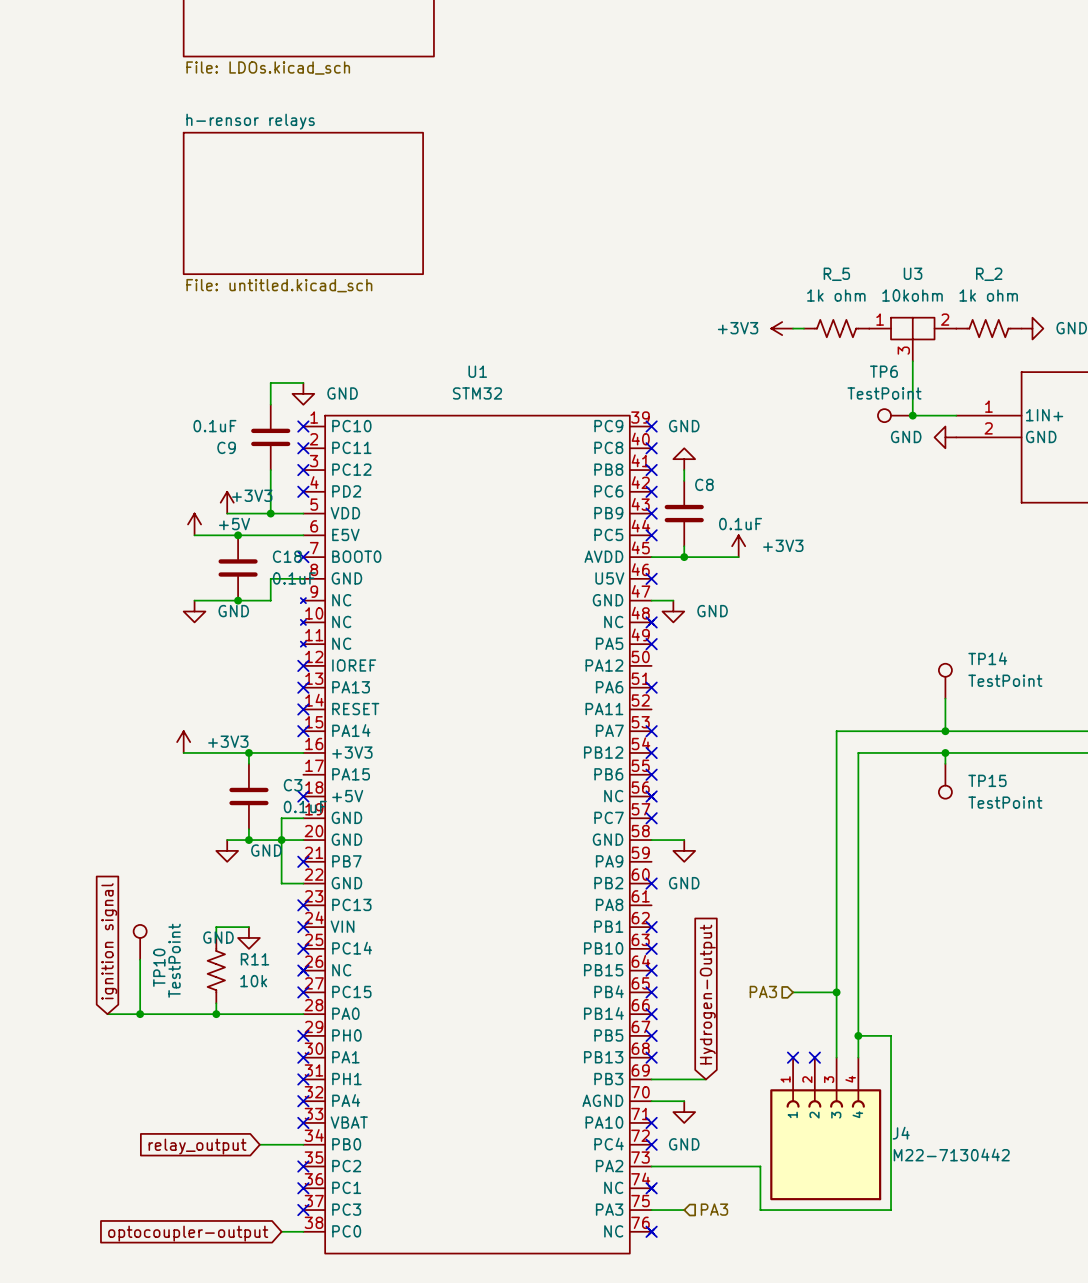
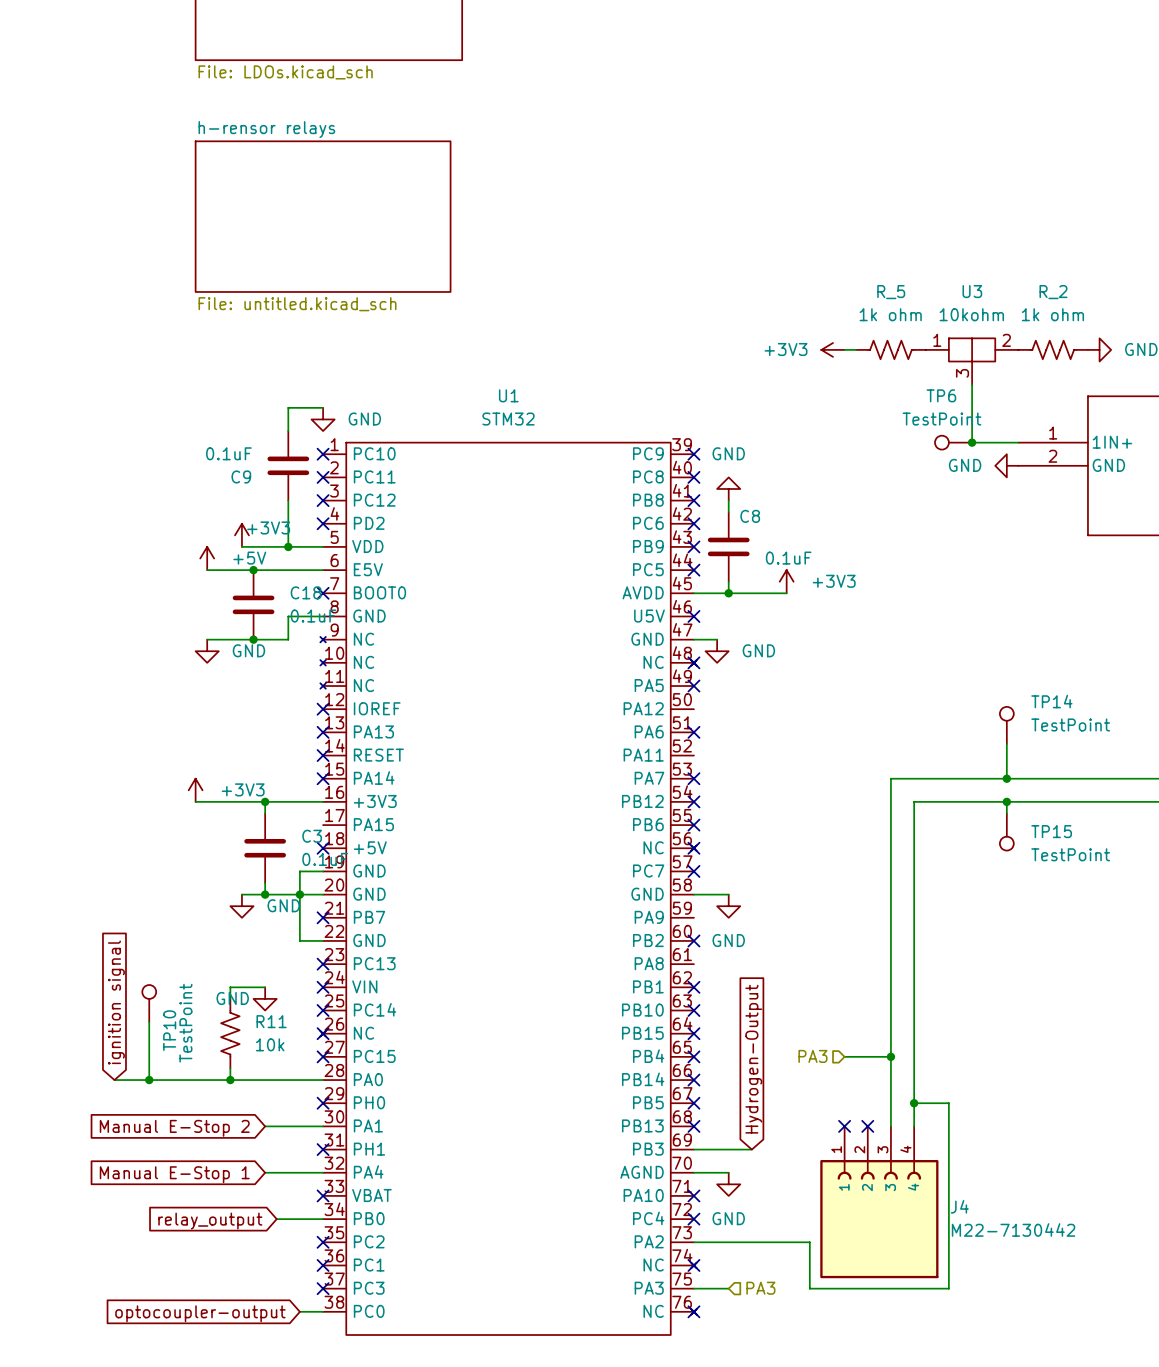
wire: none -> (265, 1126) (323, 1126)
no-connect mark: (303, 1057) -> none
global label: none -> Manual E-Stop 2 (174, 1128)
wire: none -> (265, 1172) (323, 1172)
no-connect mark: (303, 1101) -> none
global label: none -> Manual E-Stop 1 (174, 1174)

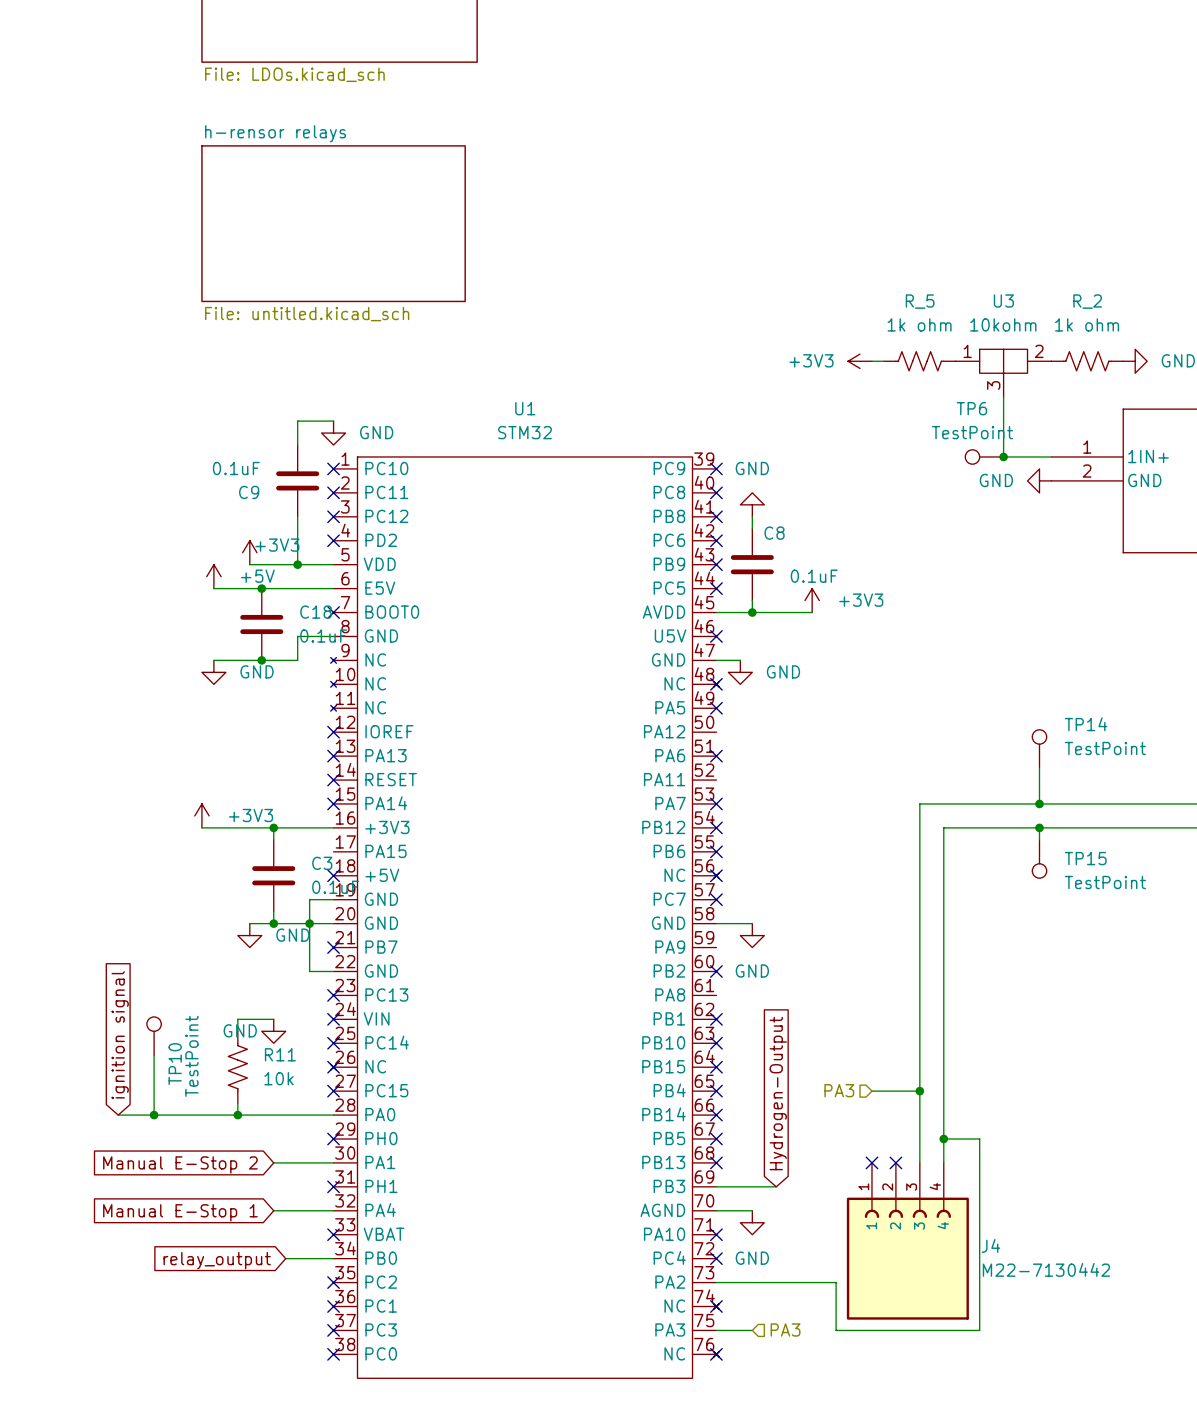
wire: (299, 1311) (323, 1311) -> none
no-connect mark: none -> (333, 1354)
global label: optocoupler-output (200, 1313) -> none

